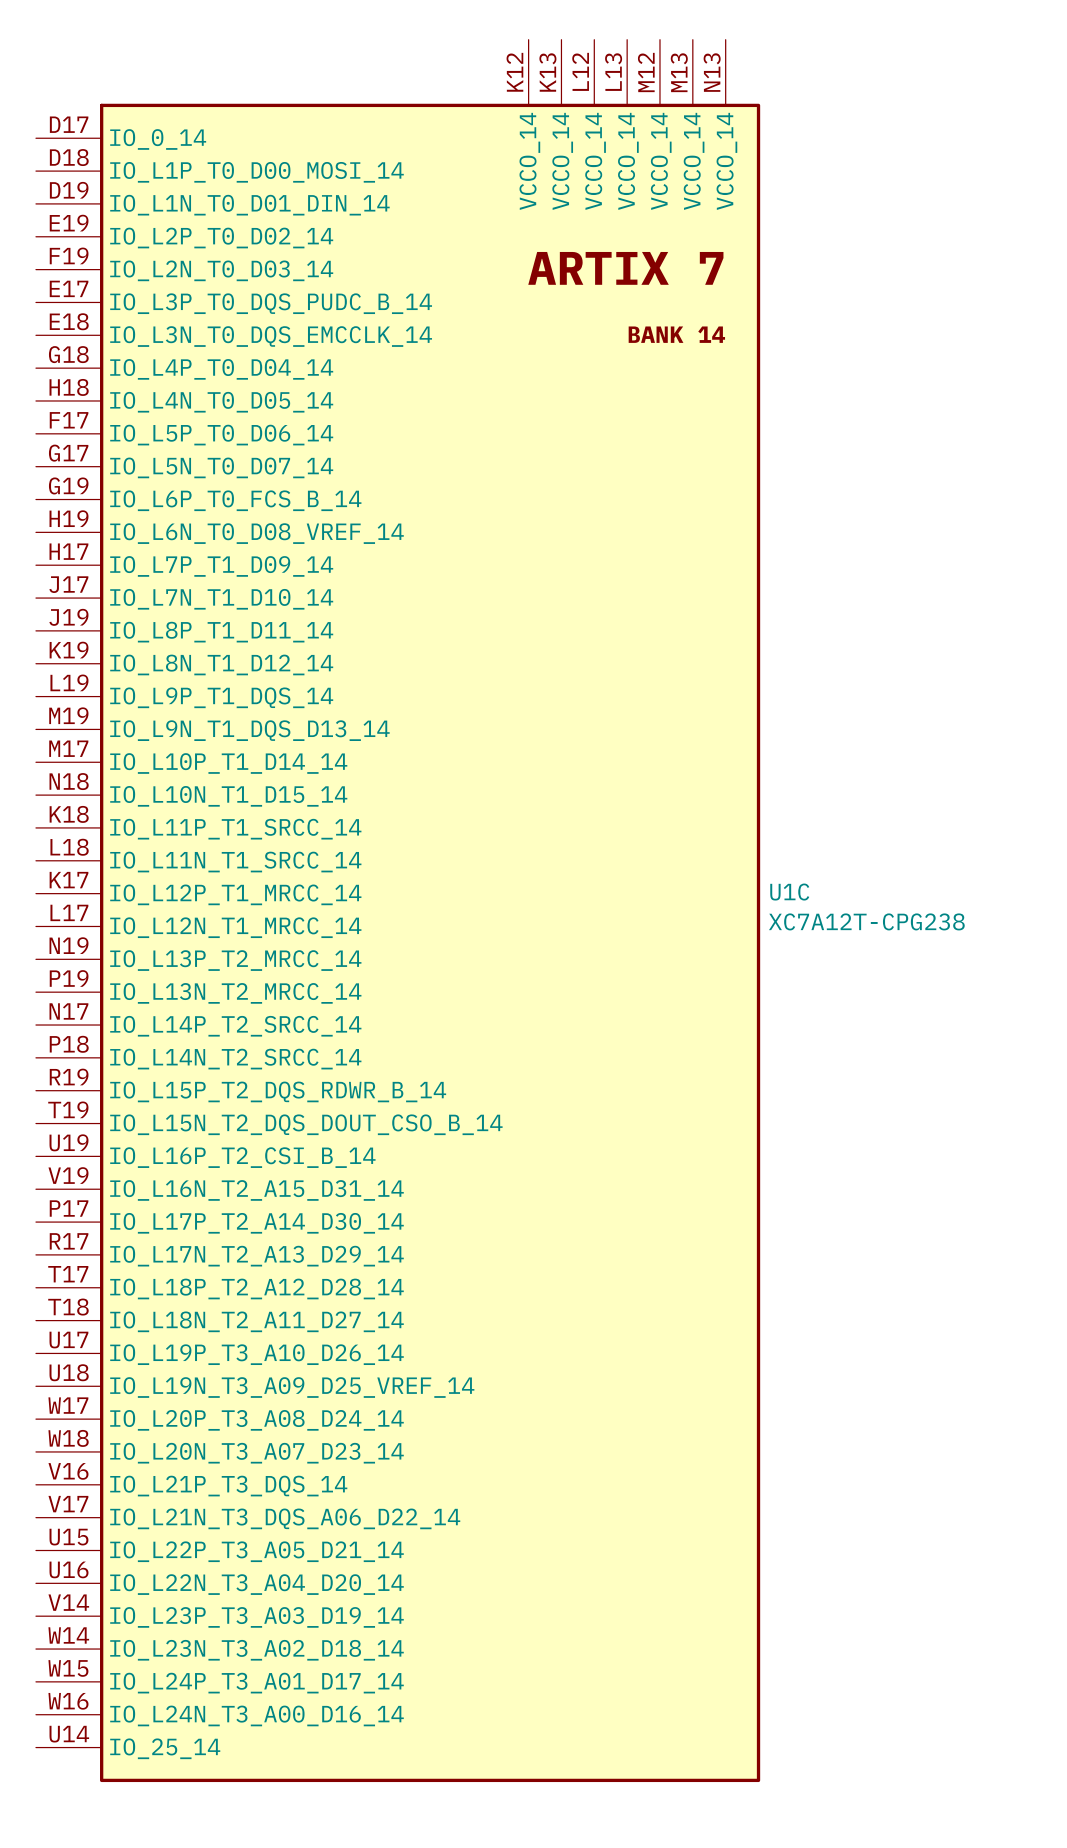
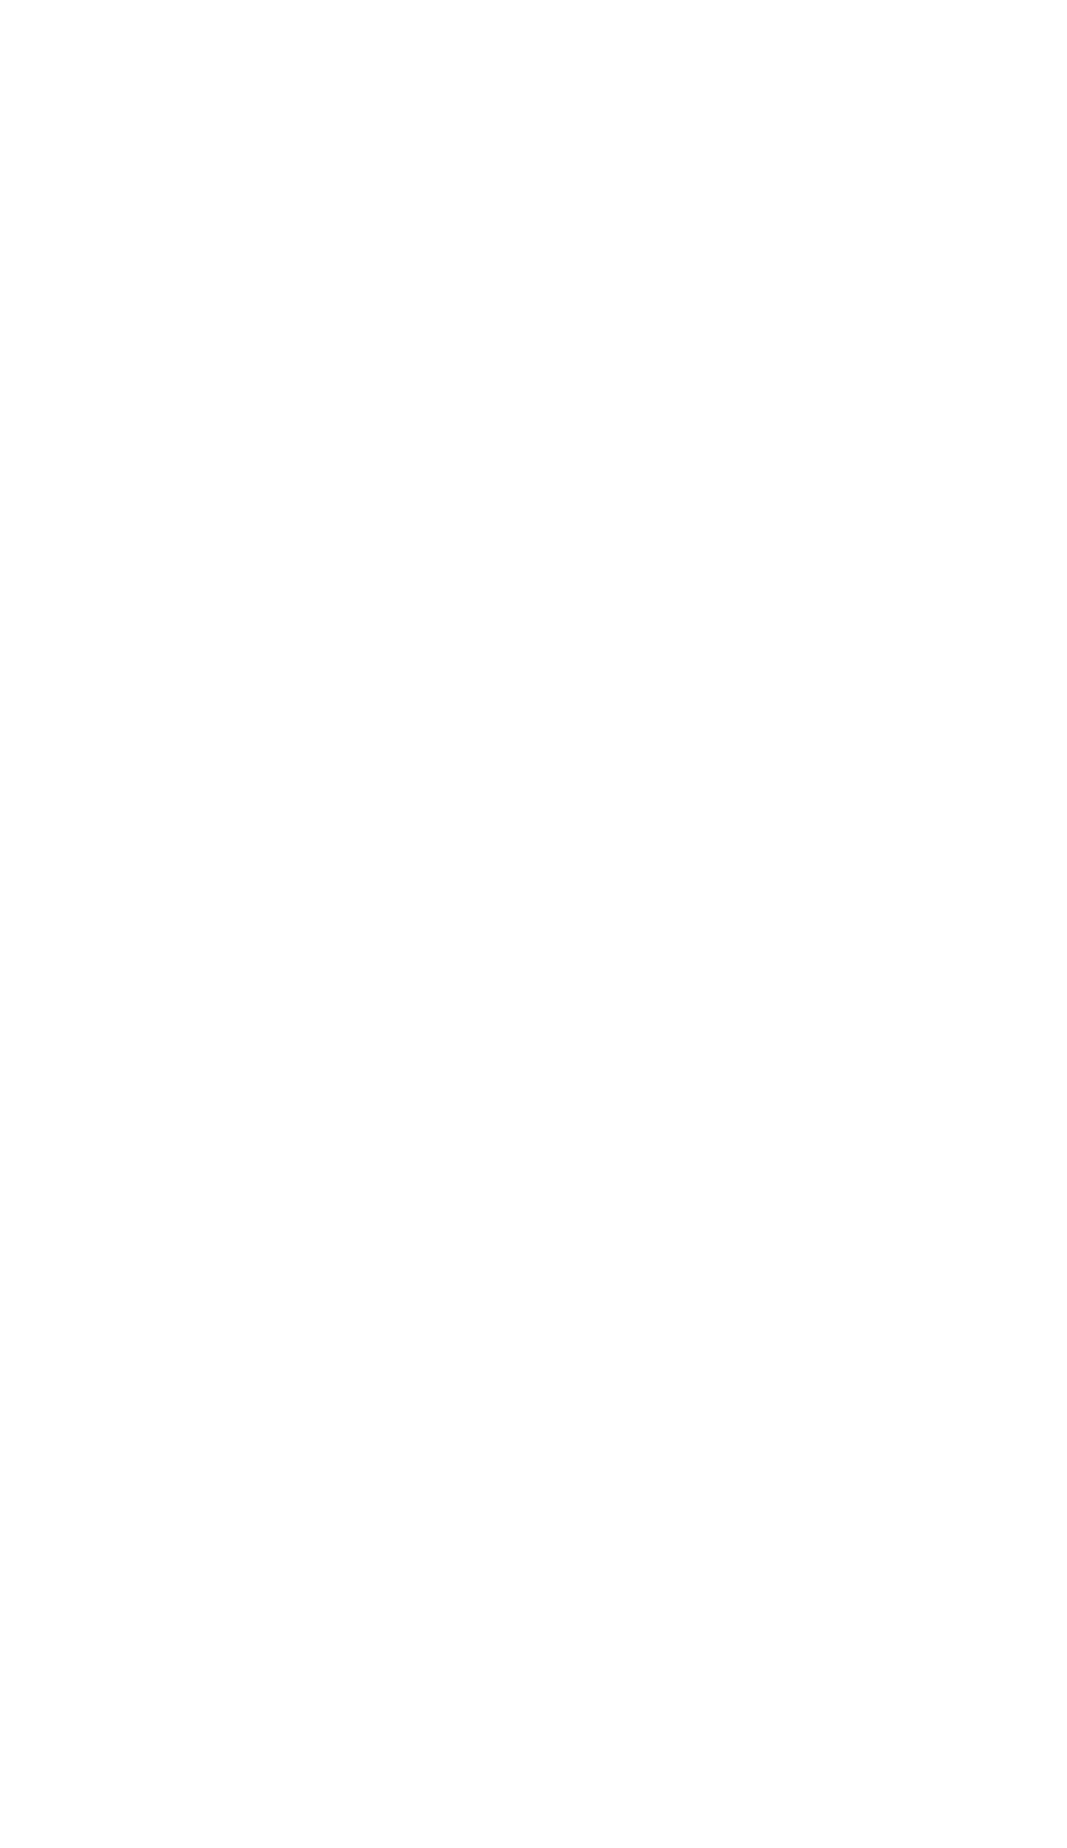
U1C: XC7A12T-CPG238 (398, 910) -> none

